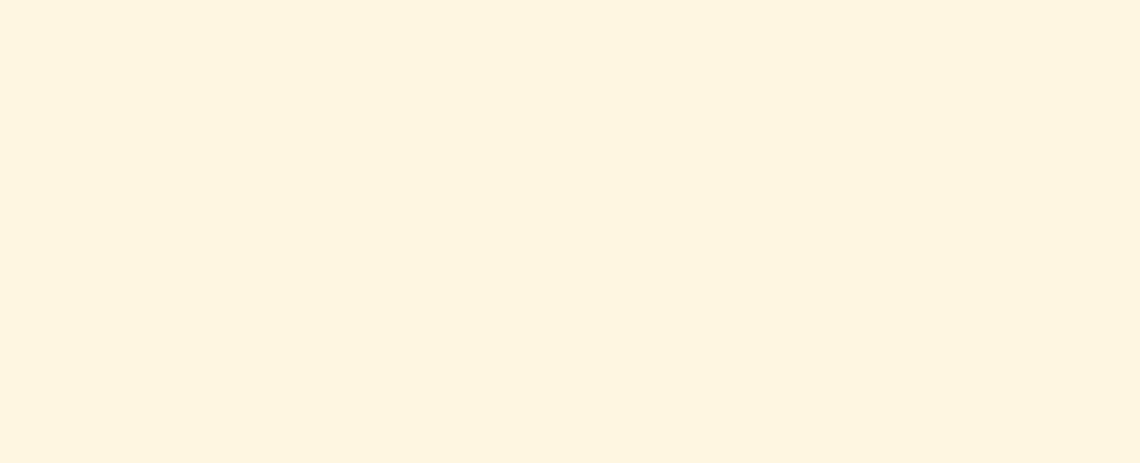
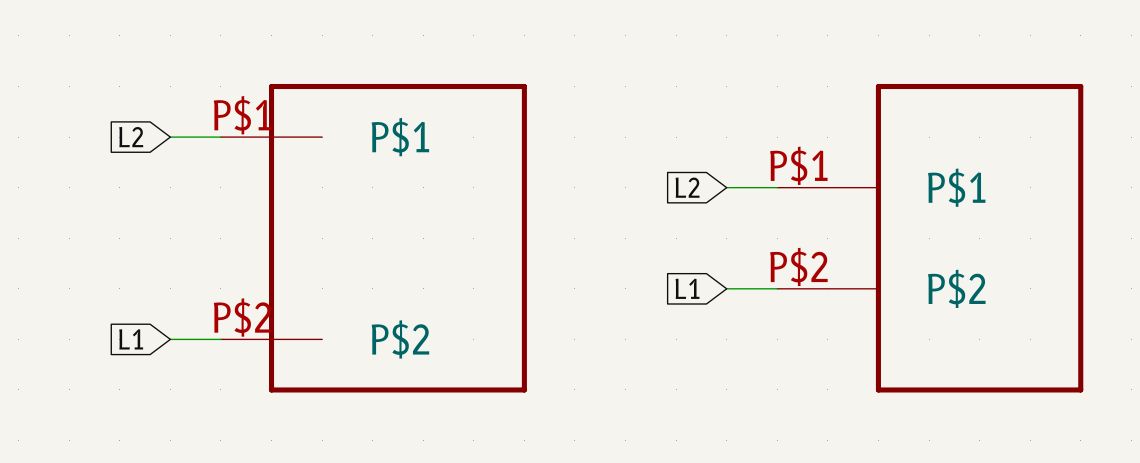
global label: none -> L2 (131, 137)
wire: none -> (170, 137) (220, 137)
global label: none -> L2 (687, 187)
wire: none -> (726, 187) (777, 187)
part: none -> (373, 238)
part: none -> (930, 238)
global label: none -> L1 (687, 288)
wire: none -> (726, 288) (777, 288)
global label: none -> L1 (131, 339)
wire: none -> (170, 339) (220, 339)

